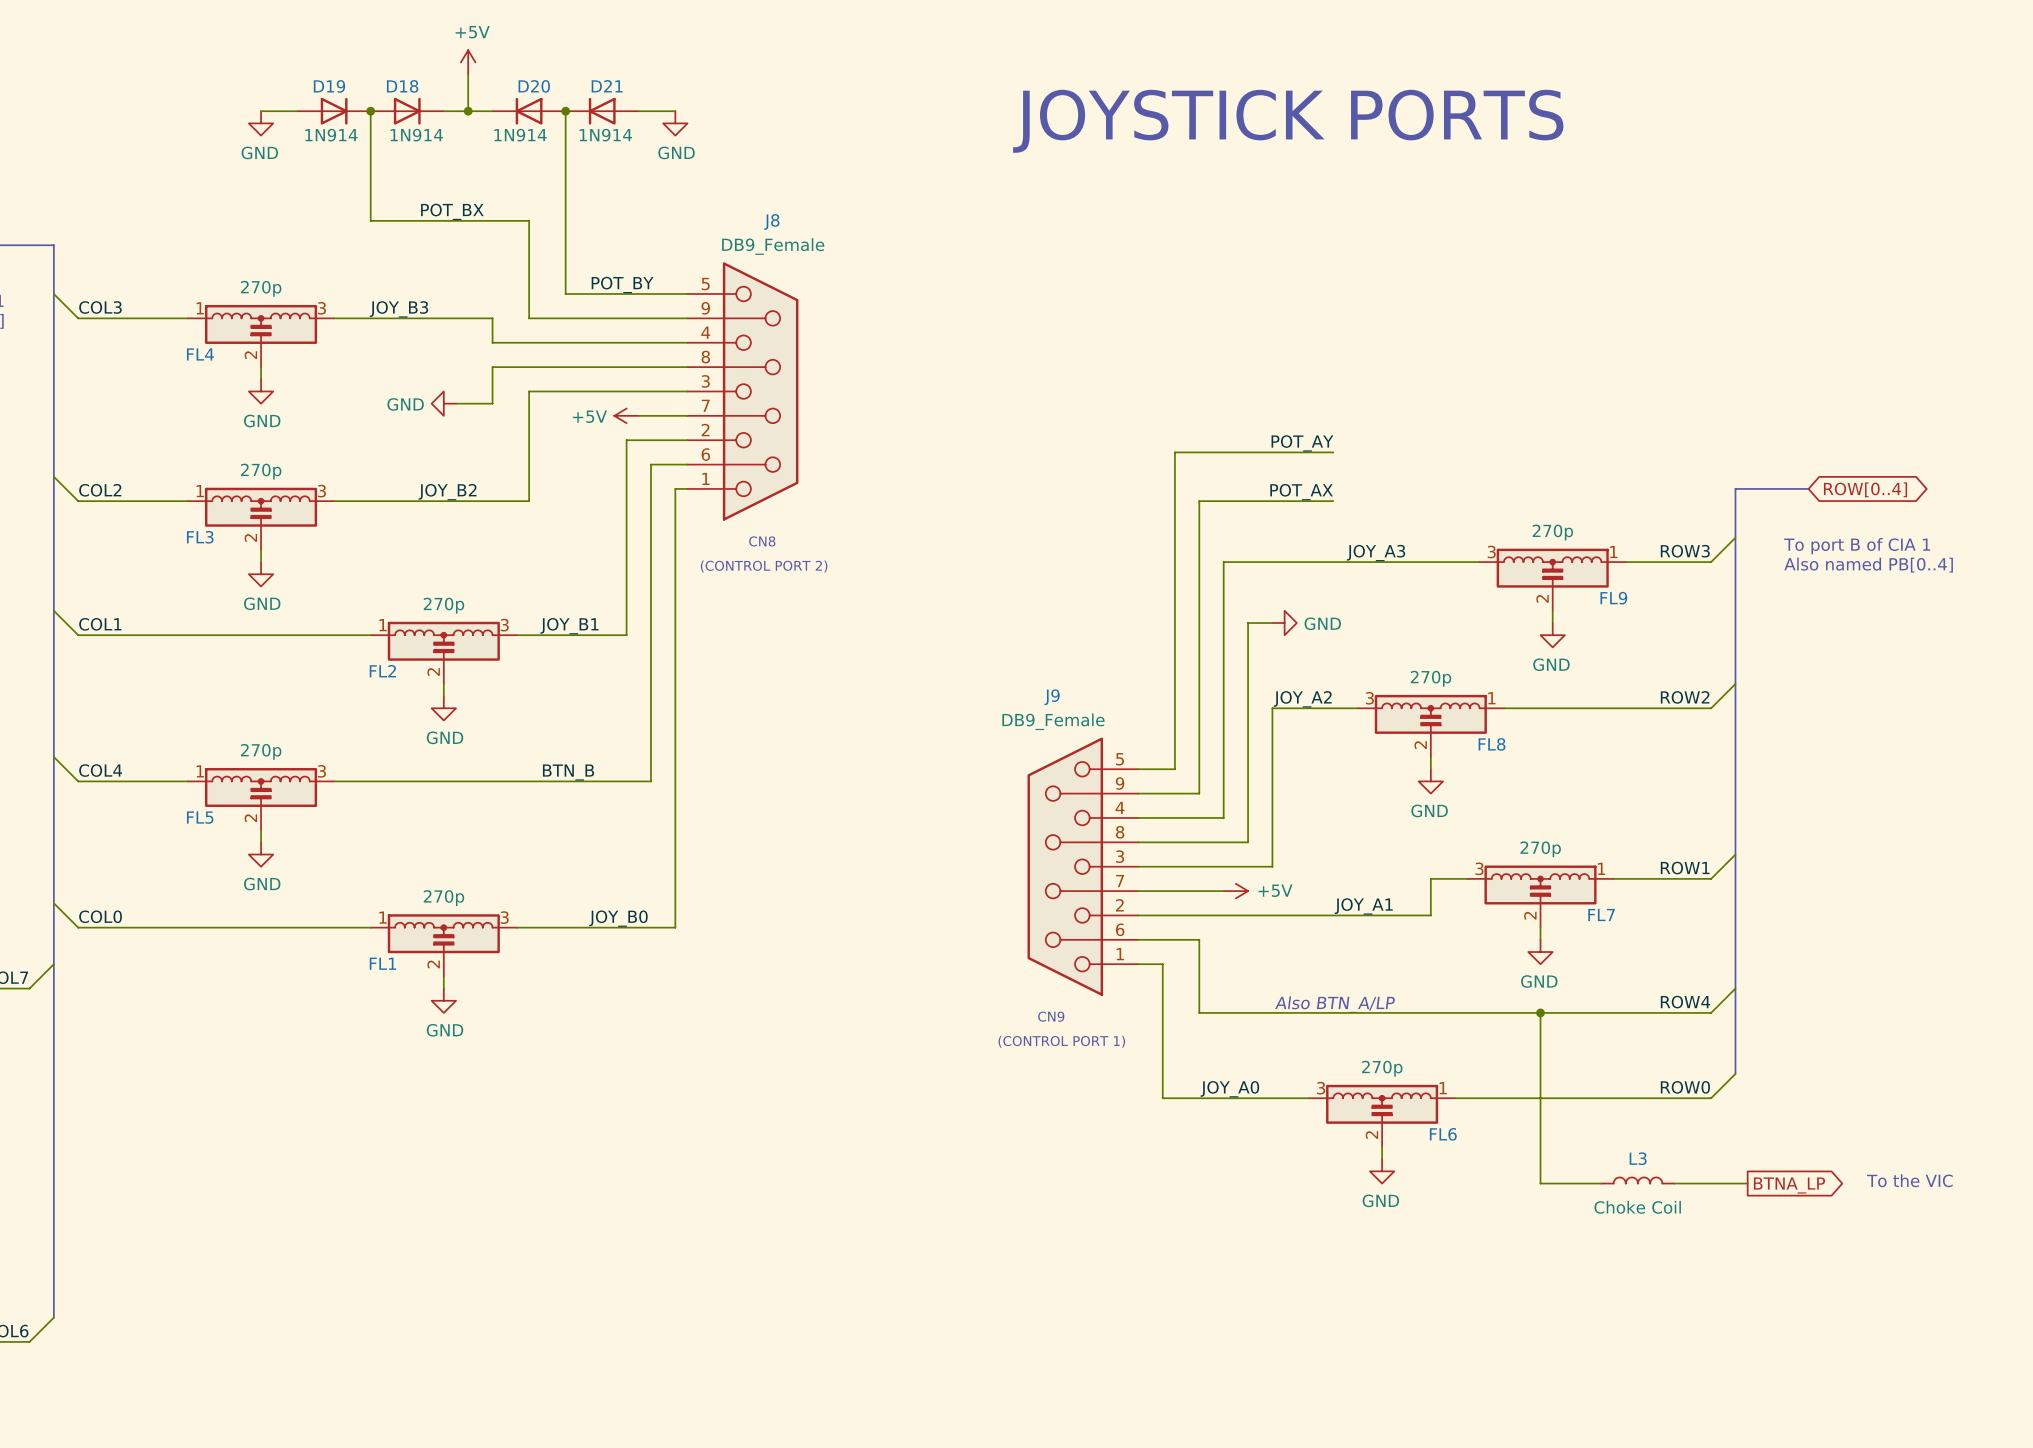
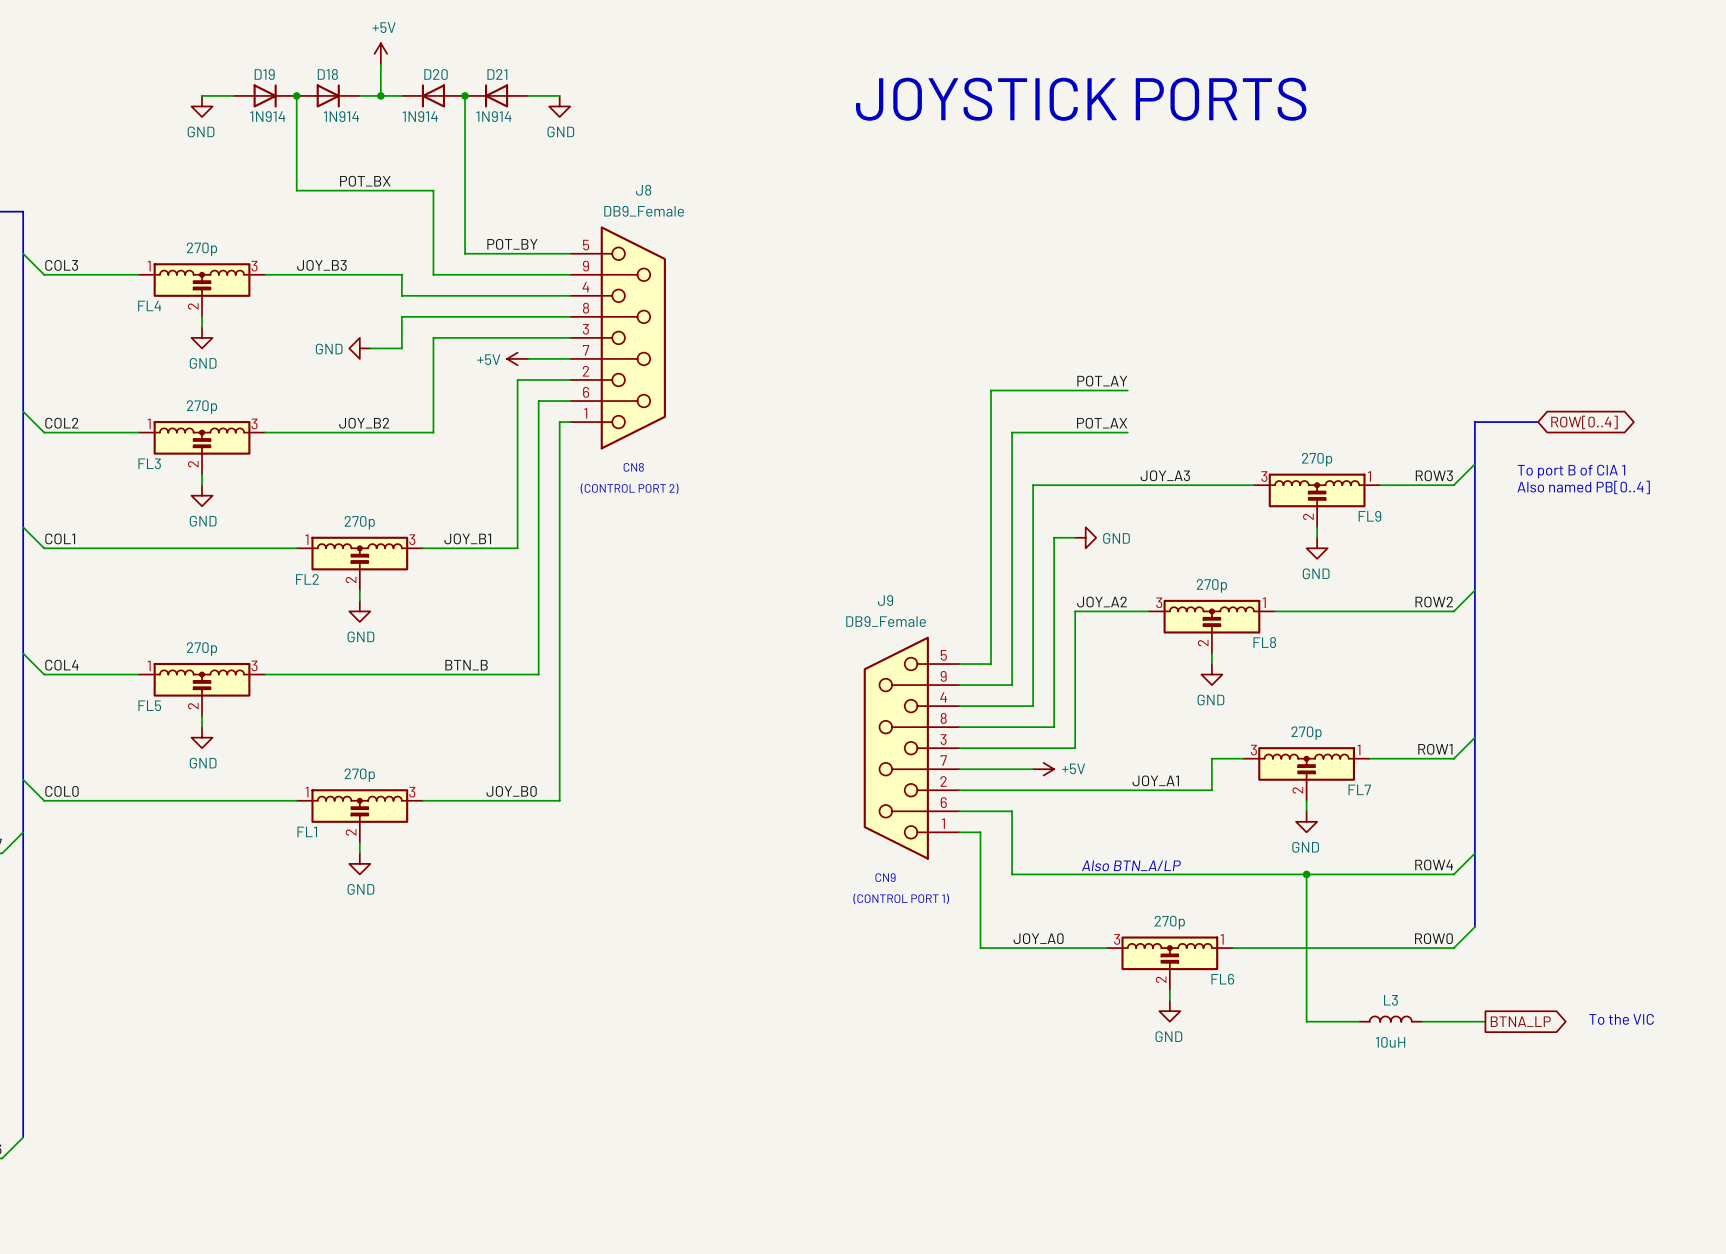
L3 value: Choke Coil (1637, 1207) -> 10uH (1390, 1042)

